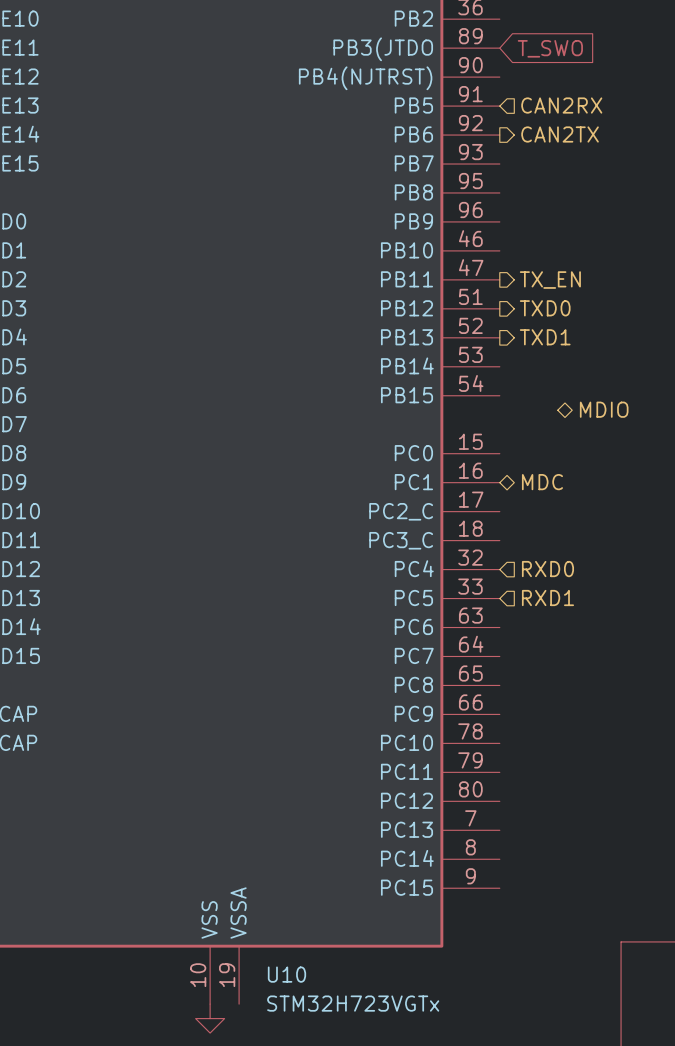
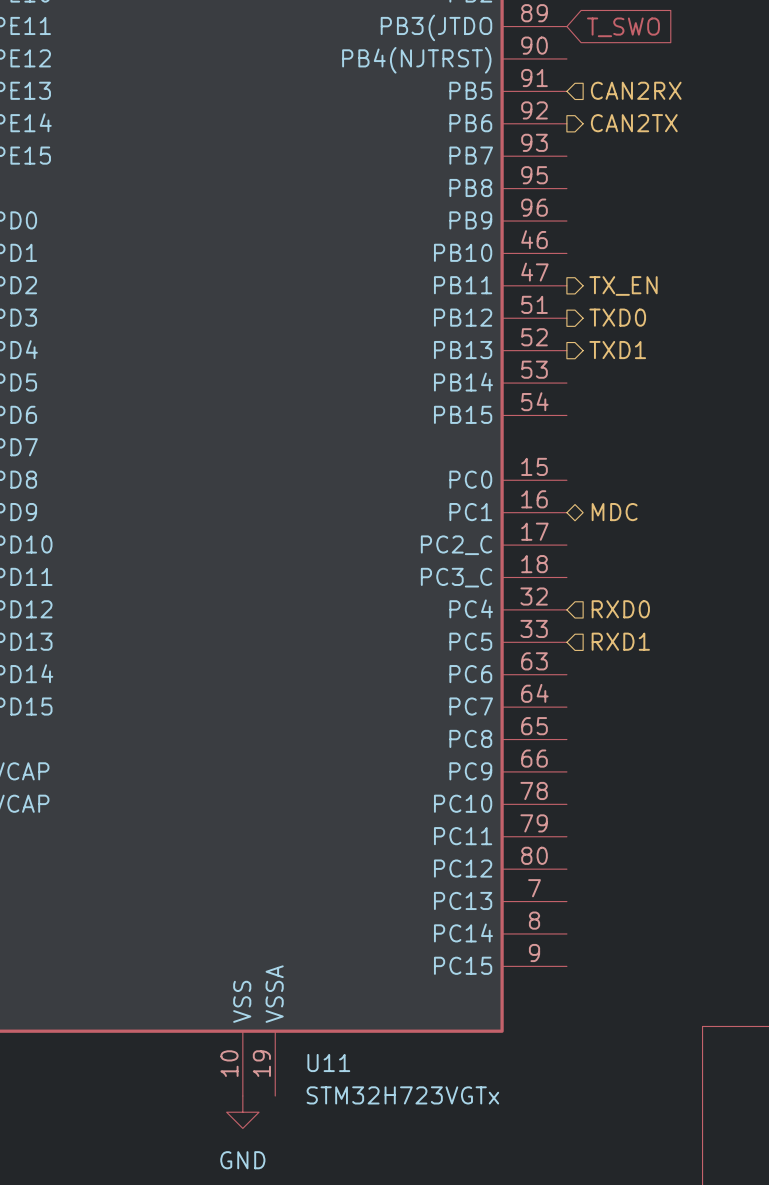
hierarchical label: MDIO (604, 409) -> none
U10 name: U10 (286, 974) -> U11 (328, 1063)

